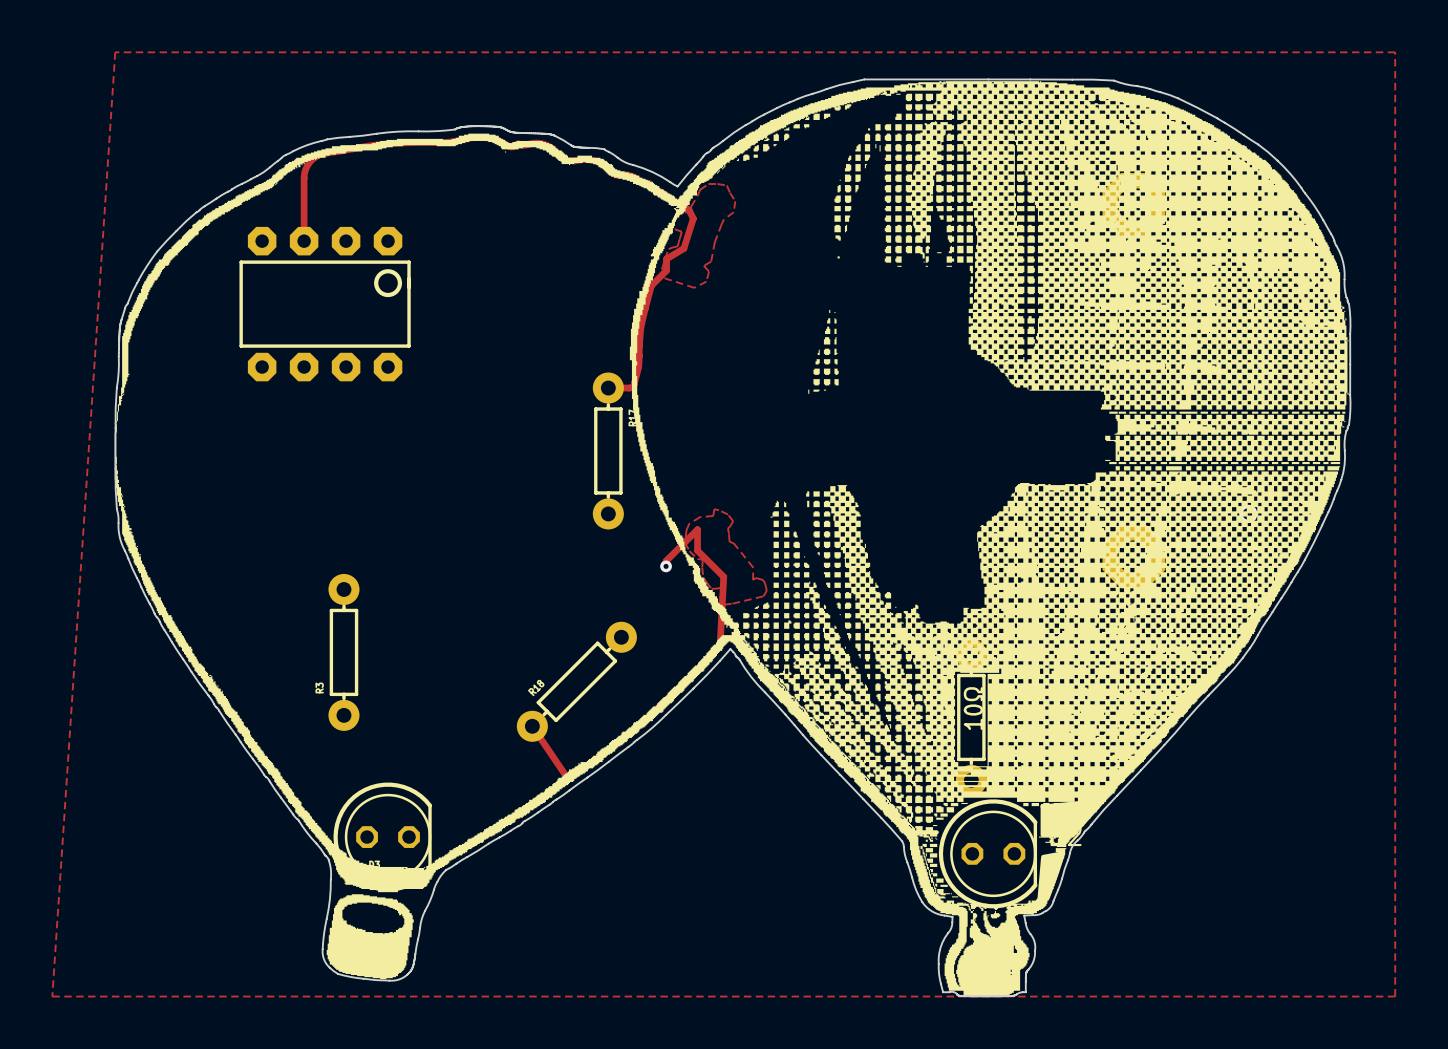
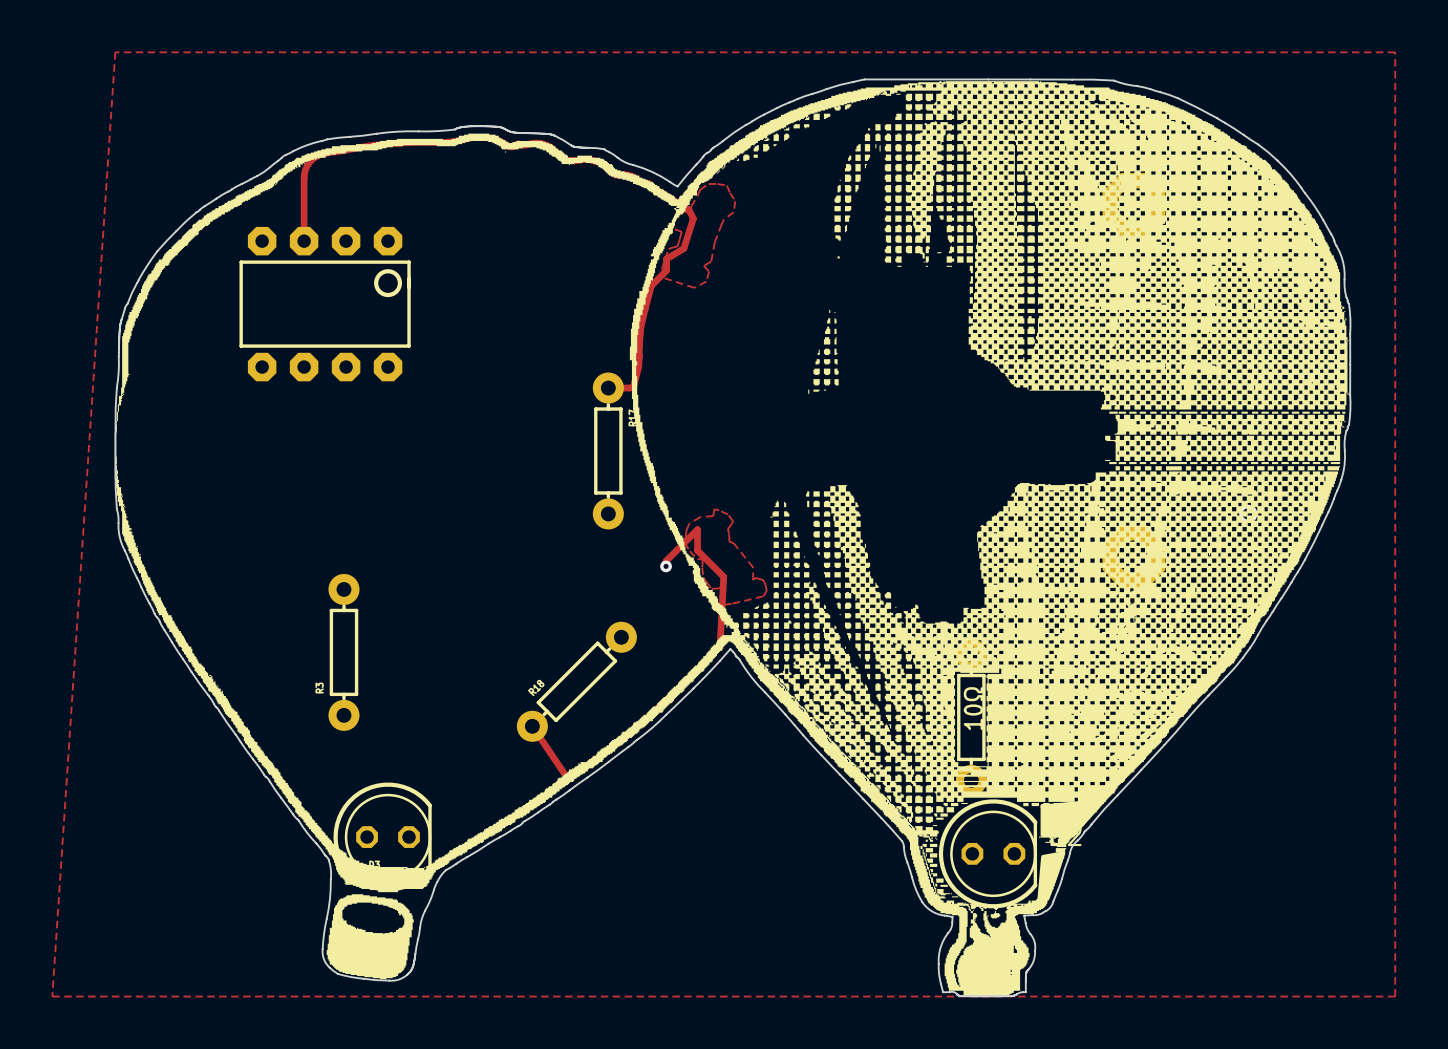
drawing: none -> [986, 674, 1215, 763]
drawing: [987, 674, 1215, 763] -> none

